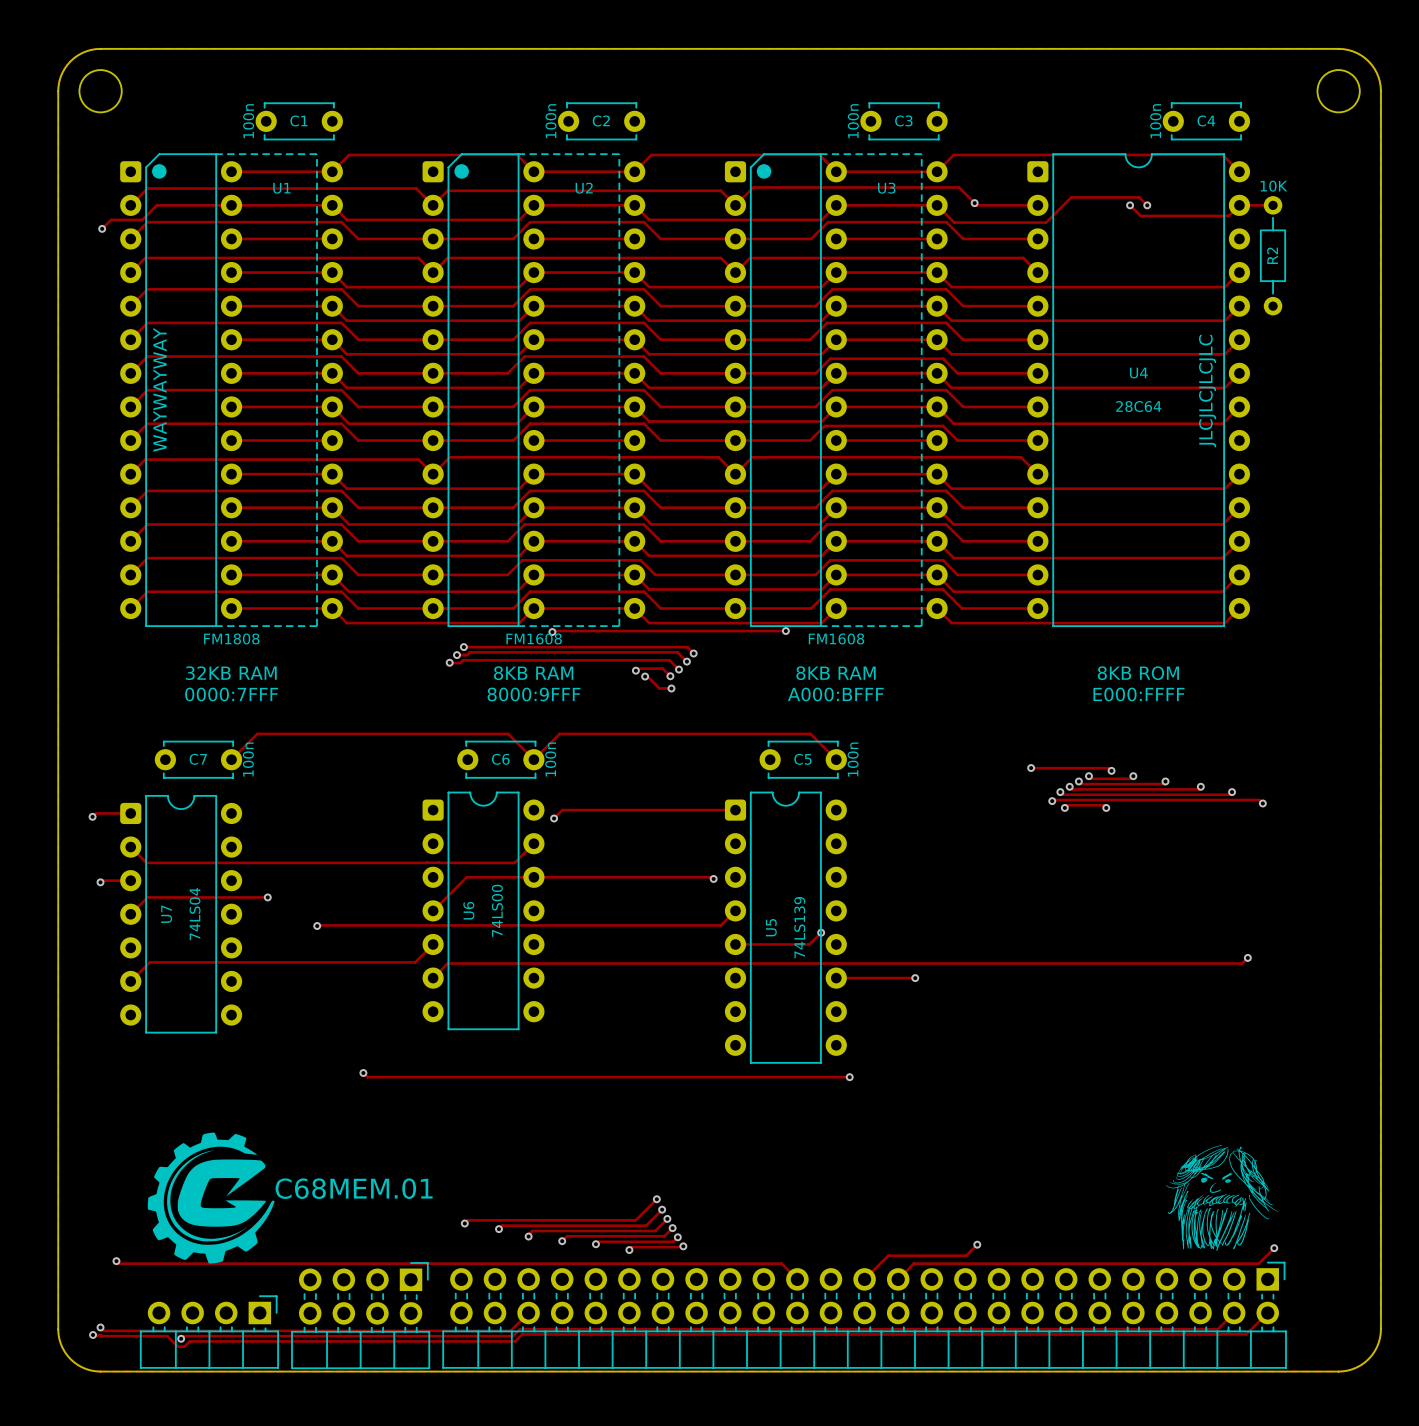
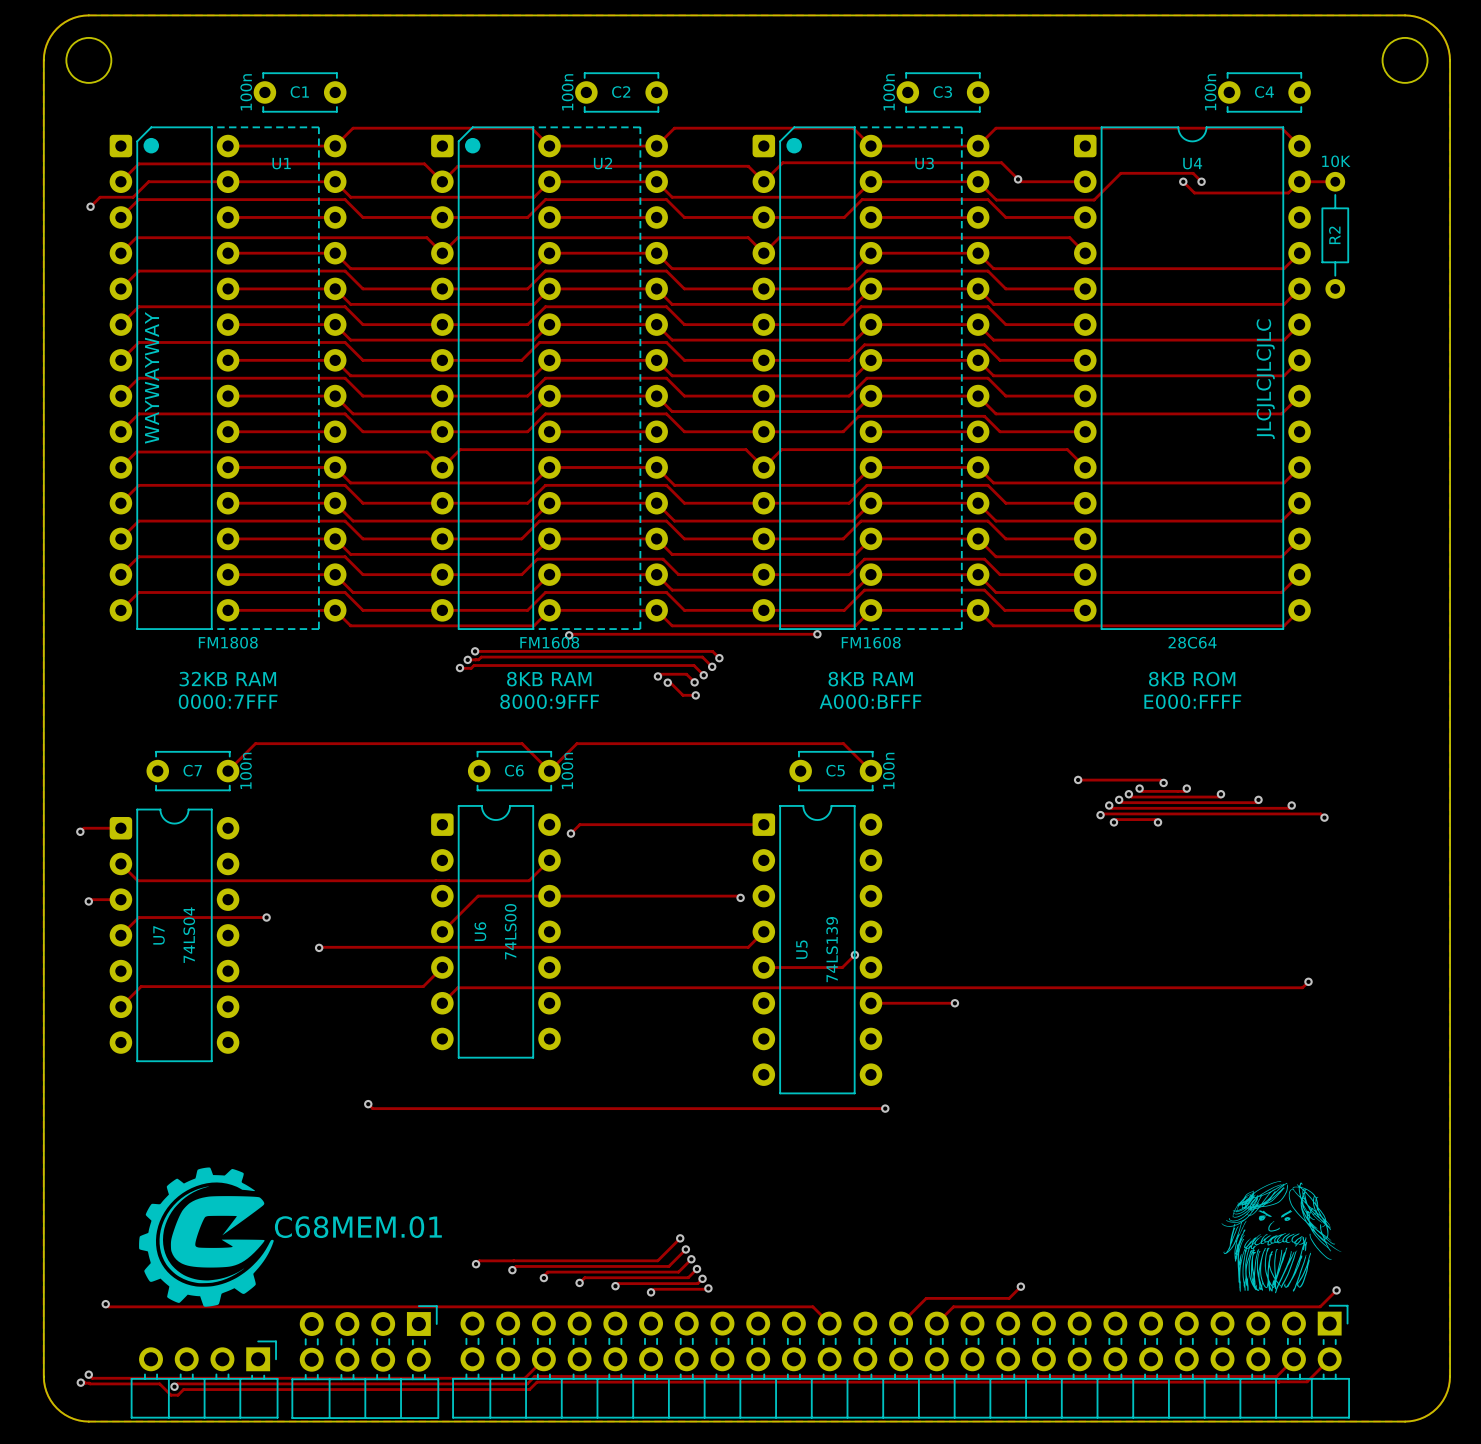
U4 name position: U4 (1138, 373) -> U4 (1192, 163)
U4 value position: 28C64 (1138, 406) -> 28C64 (1192, 642)

